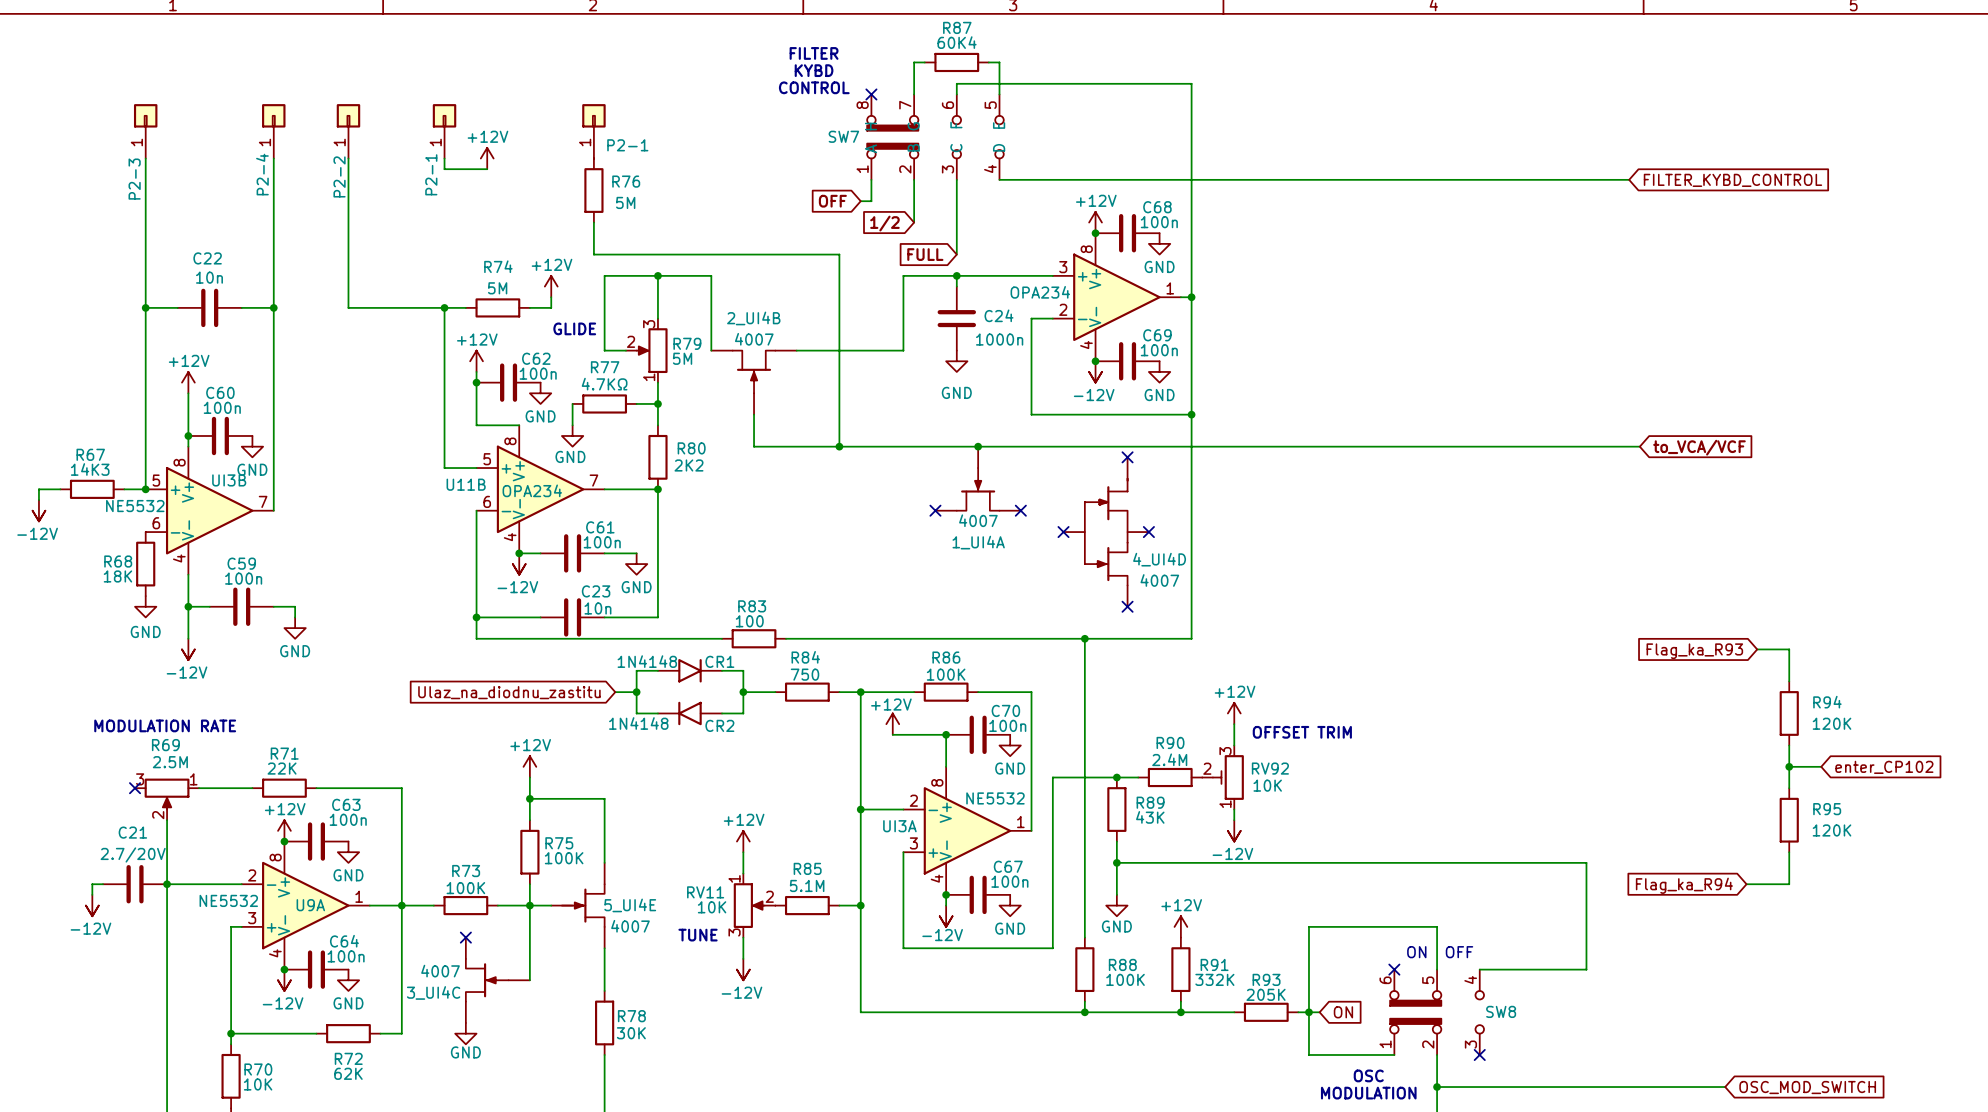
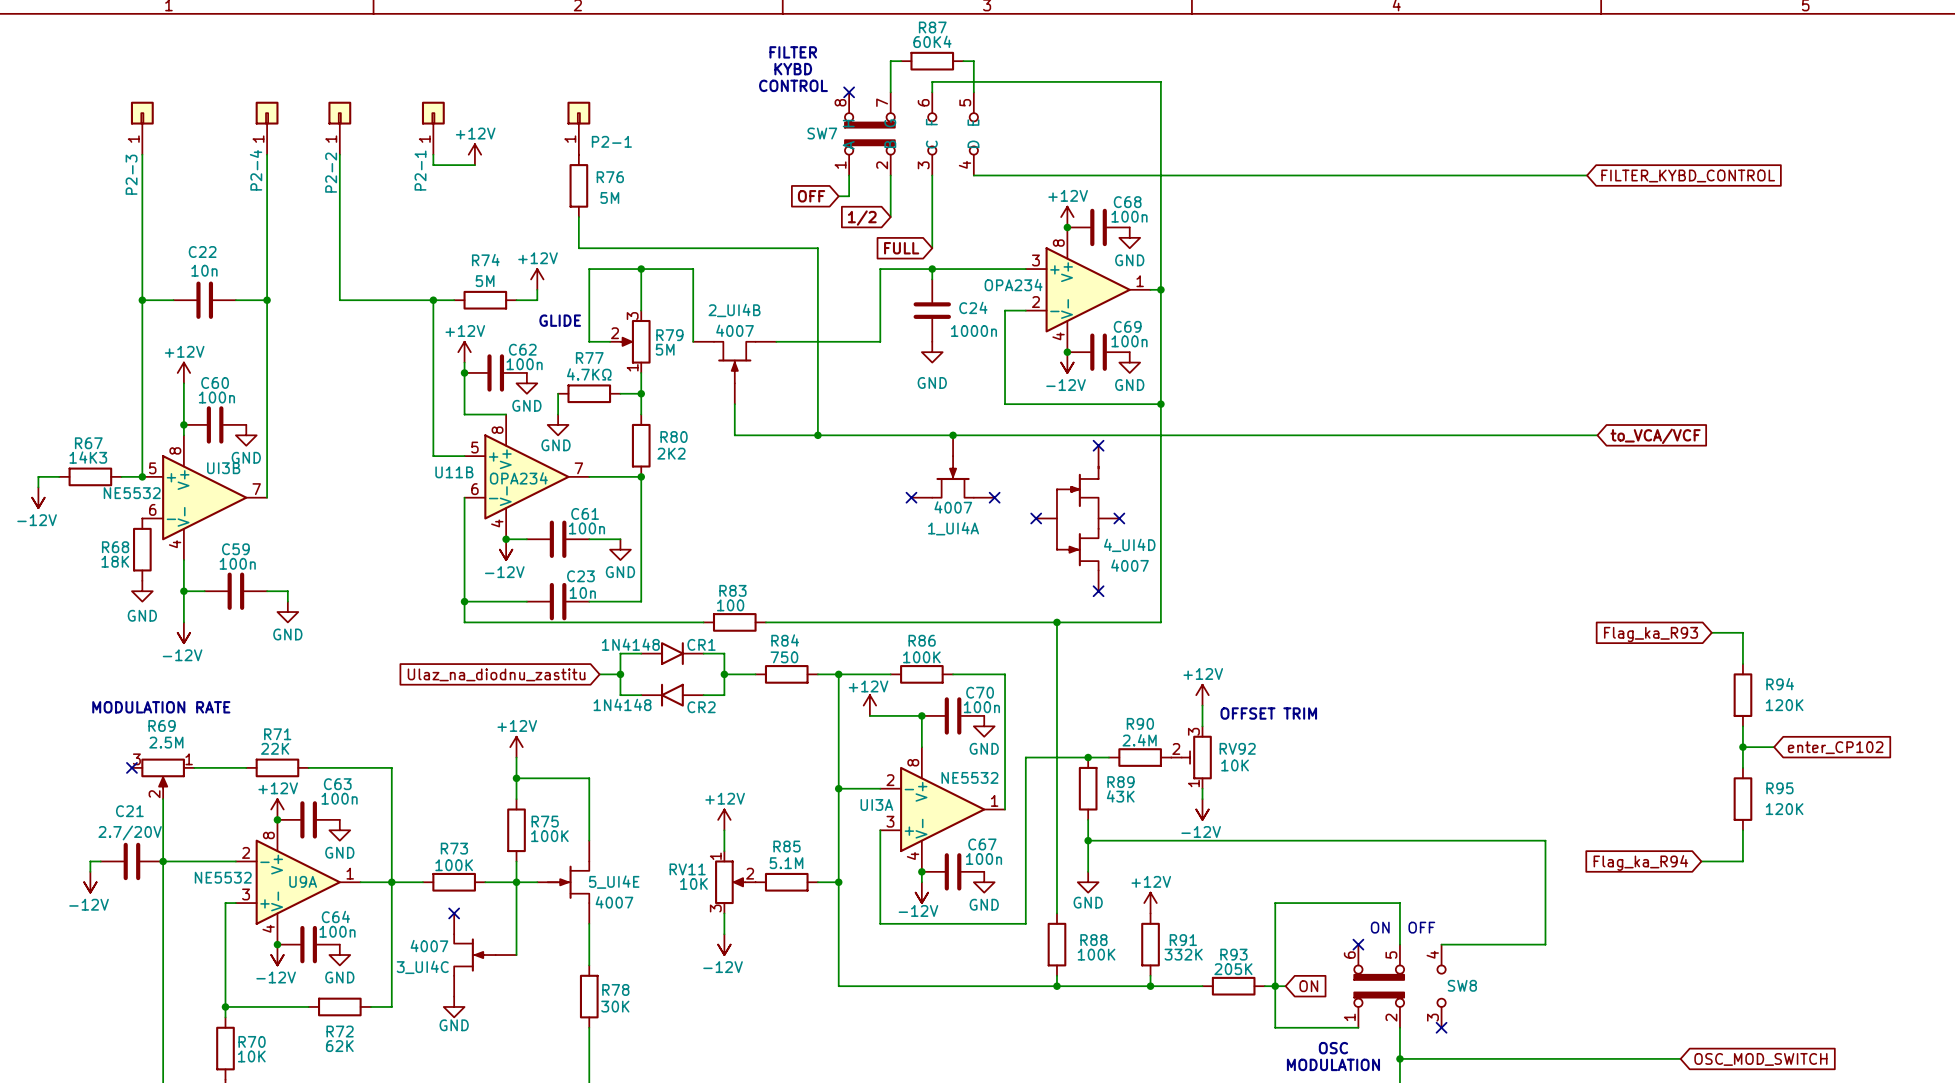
text: TUNE (698, 935) -> none

